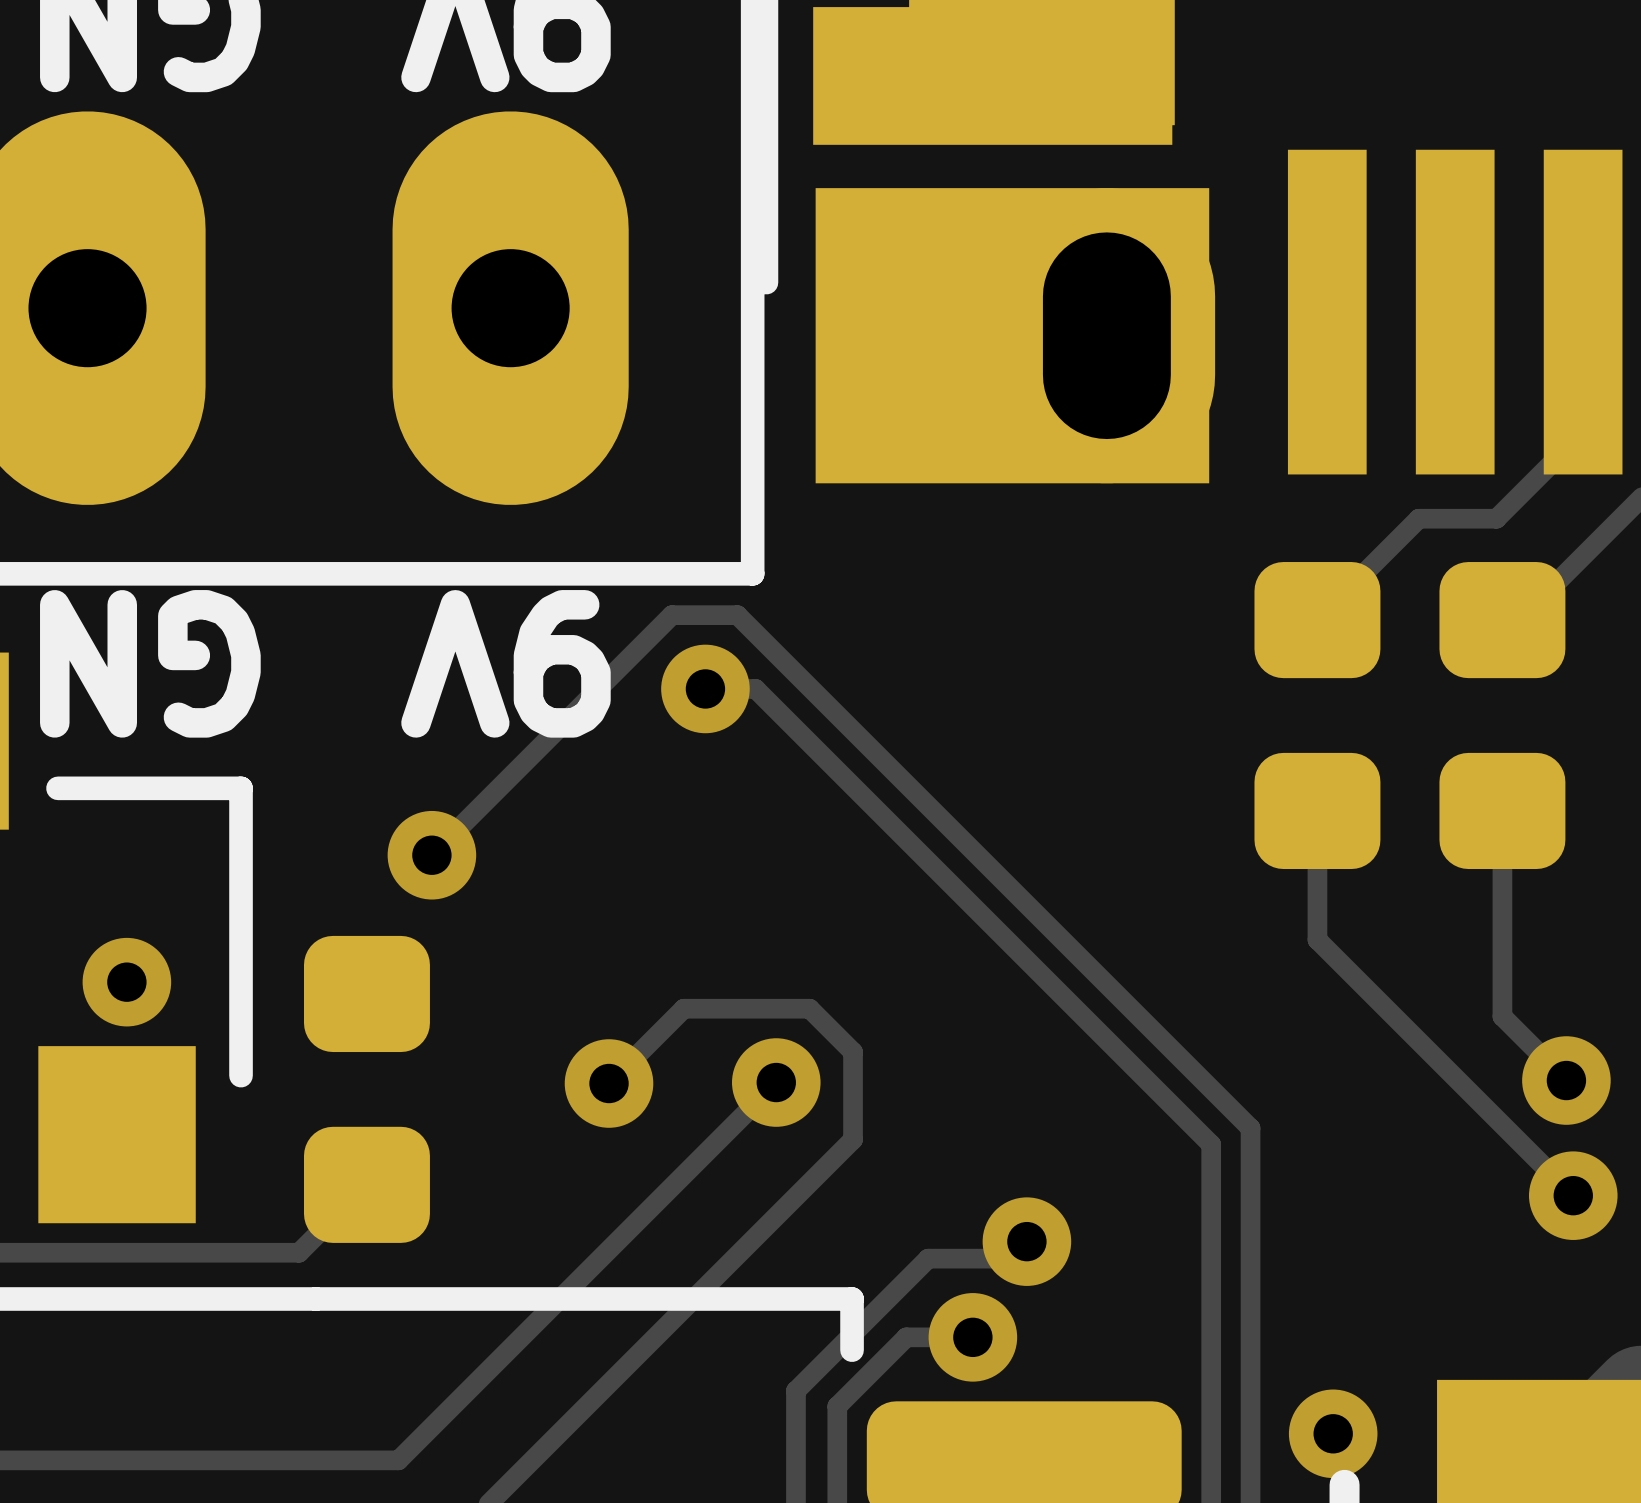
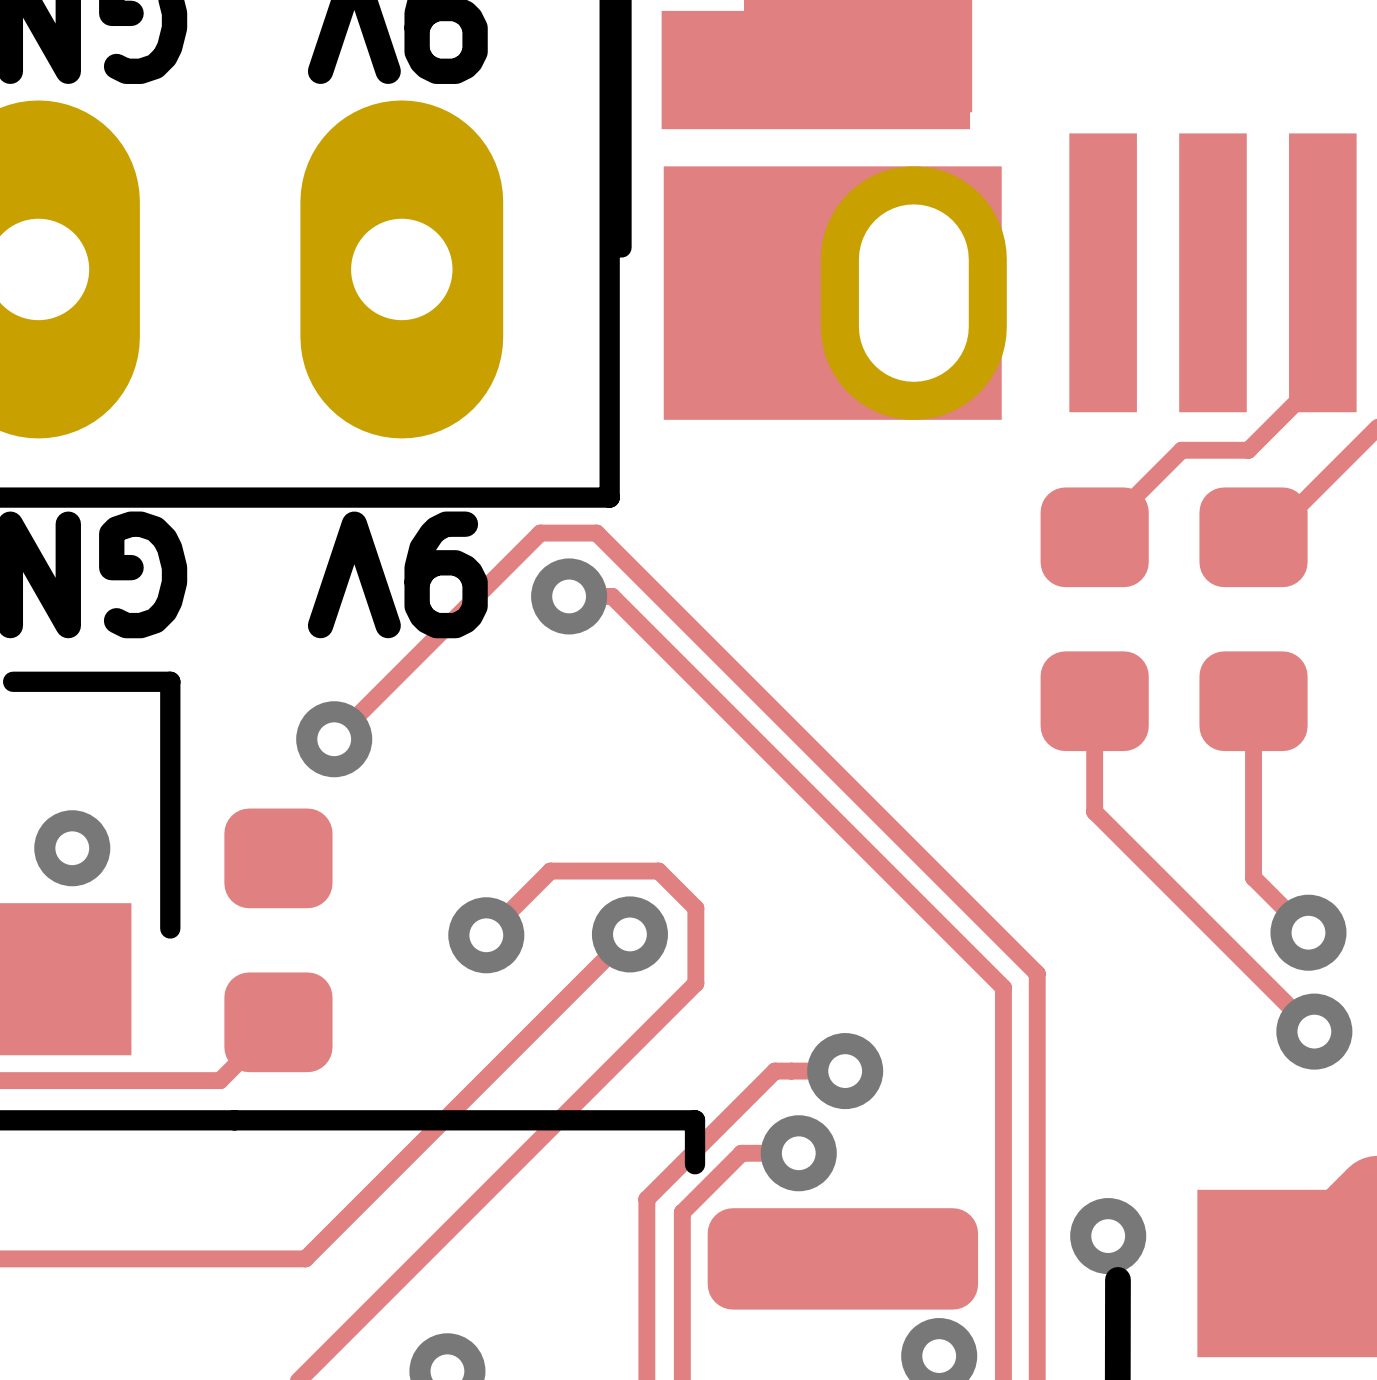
track: (1026, 1241) (1009, 1258) (928, 1258) -> (845, 1071) (774, 1071) (760, 1085)

